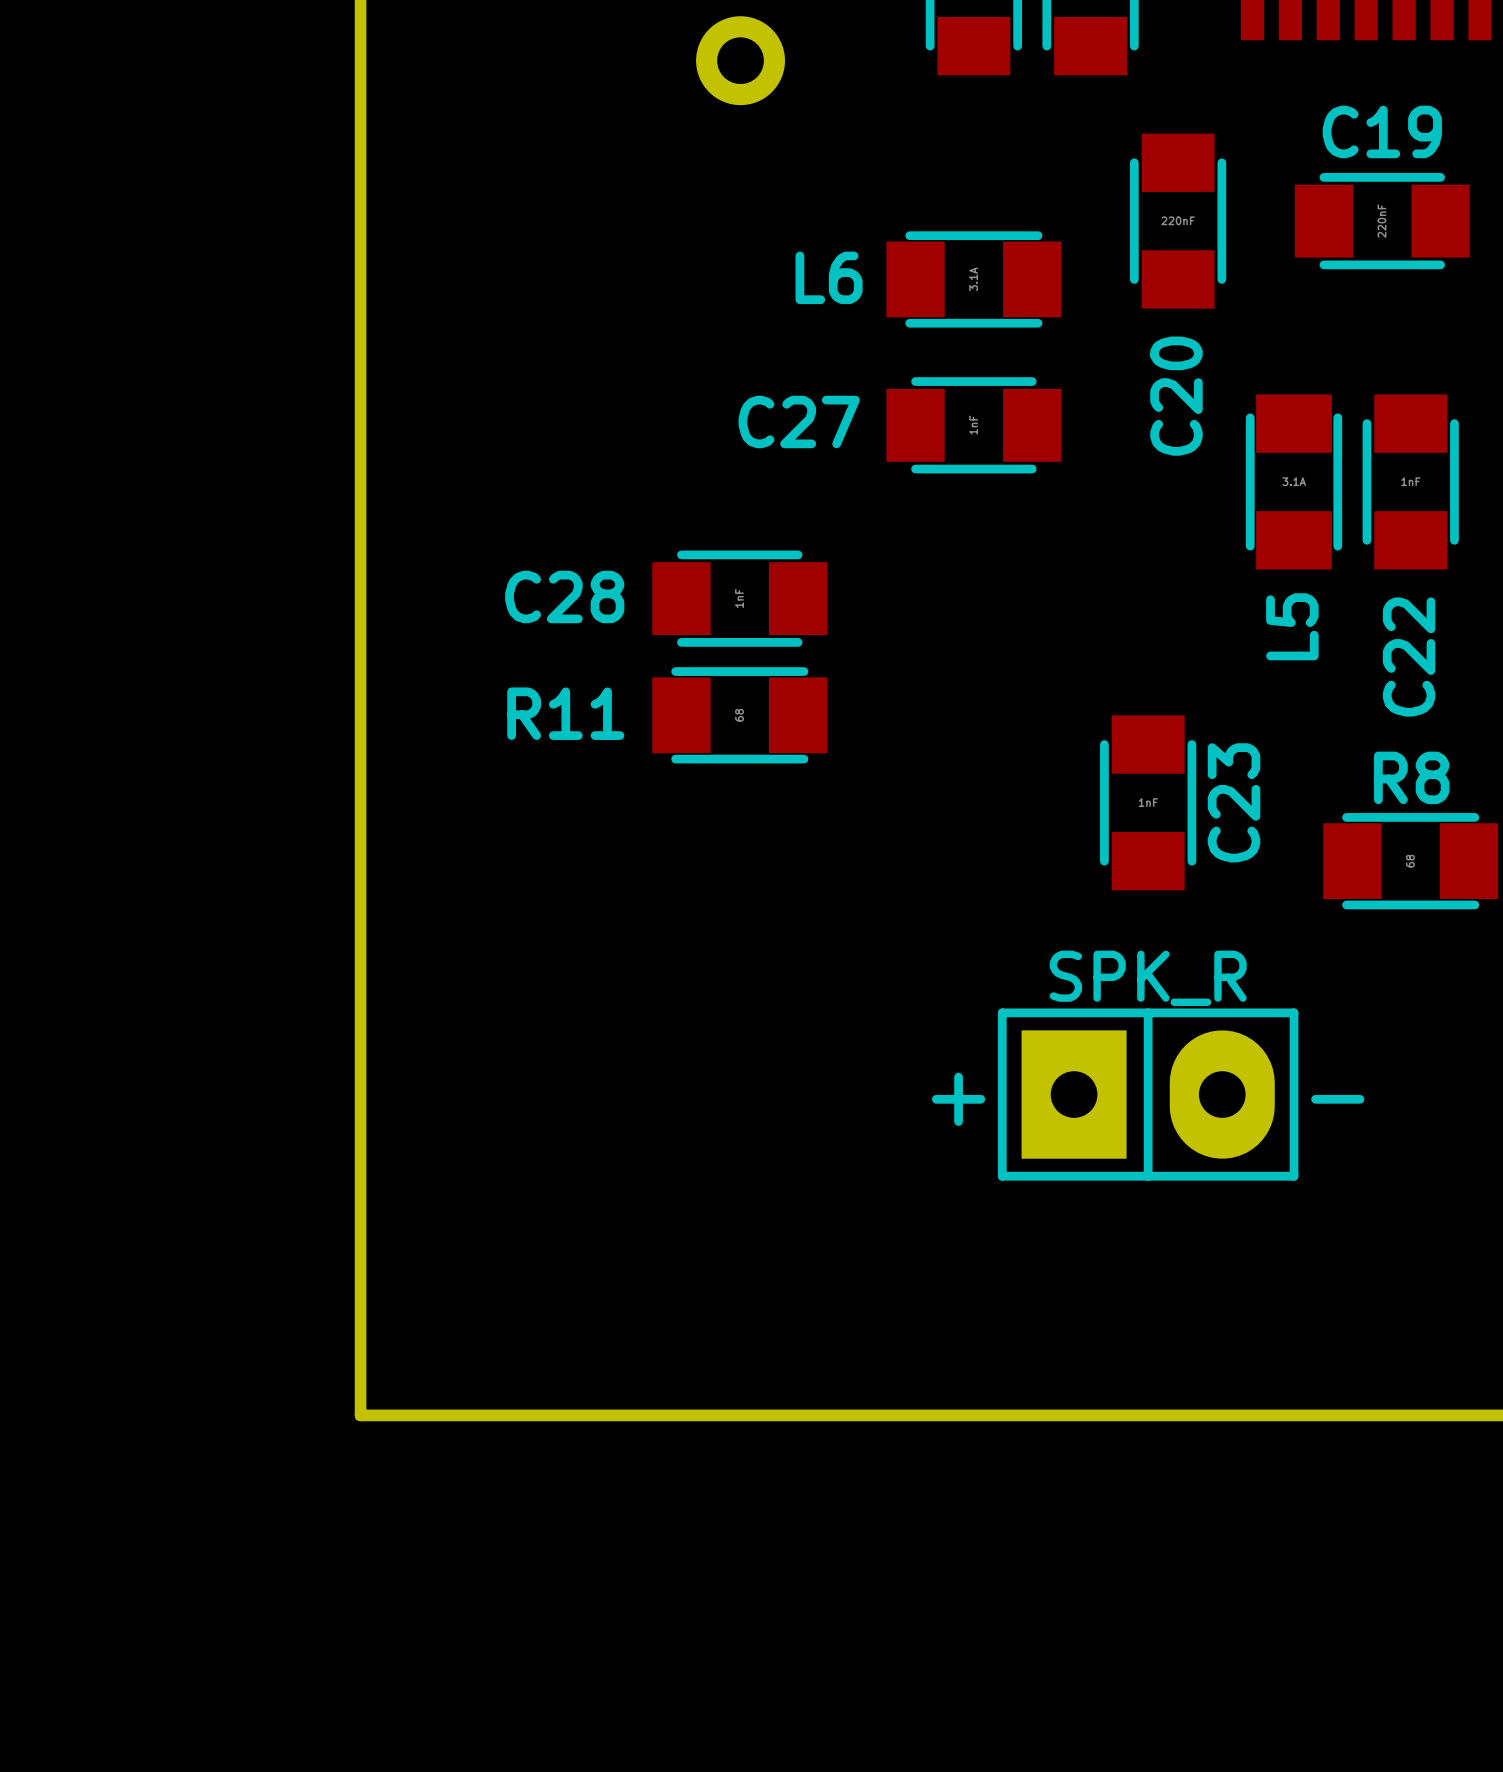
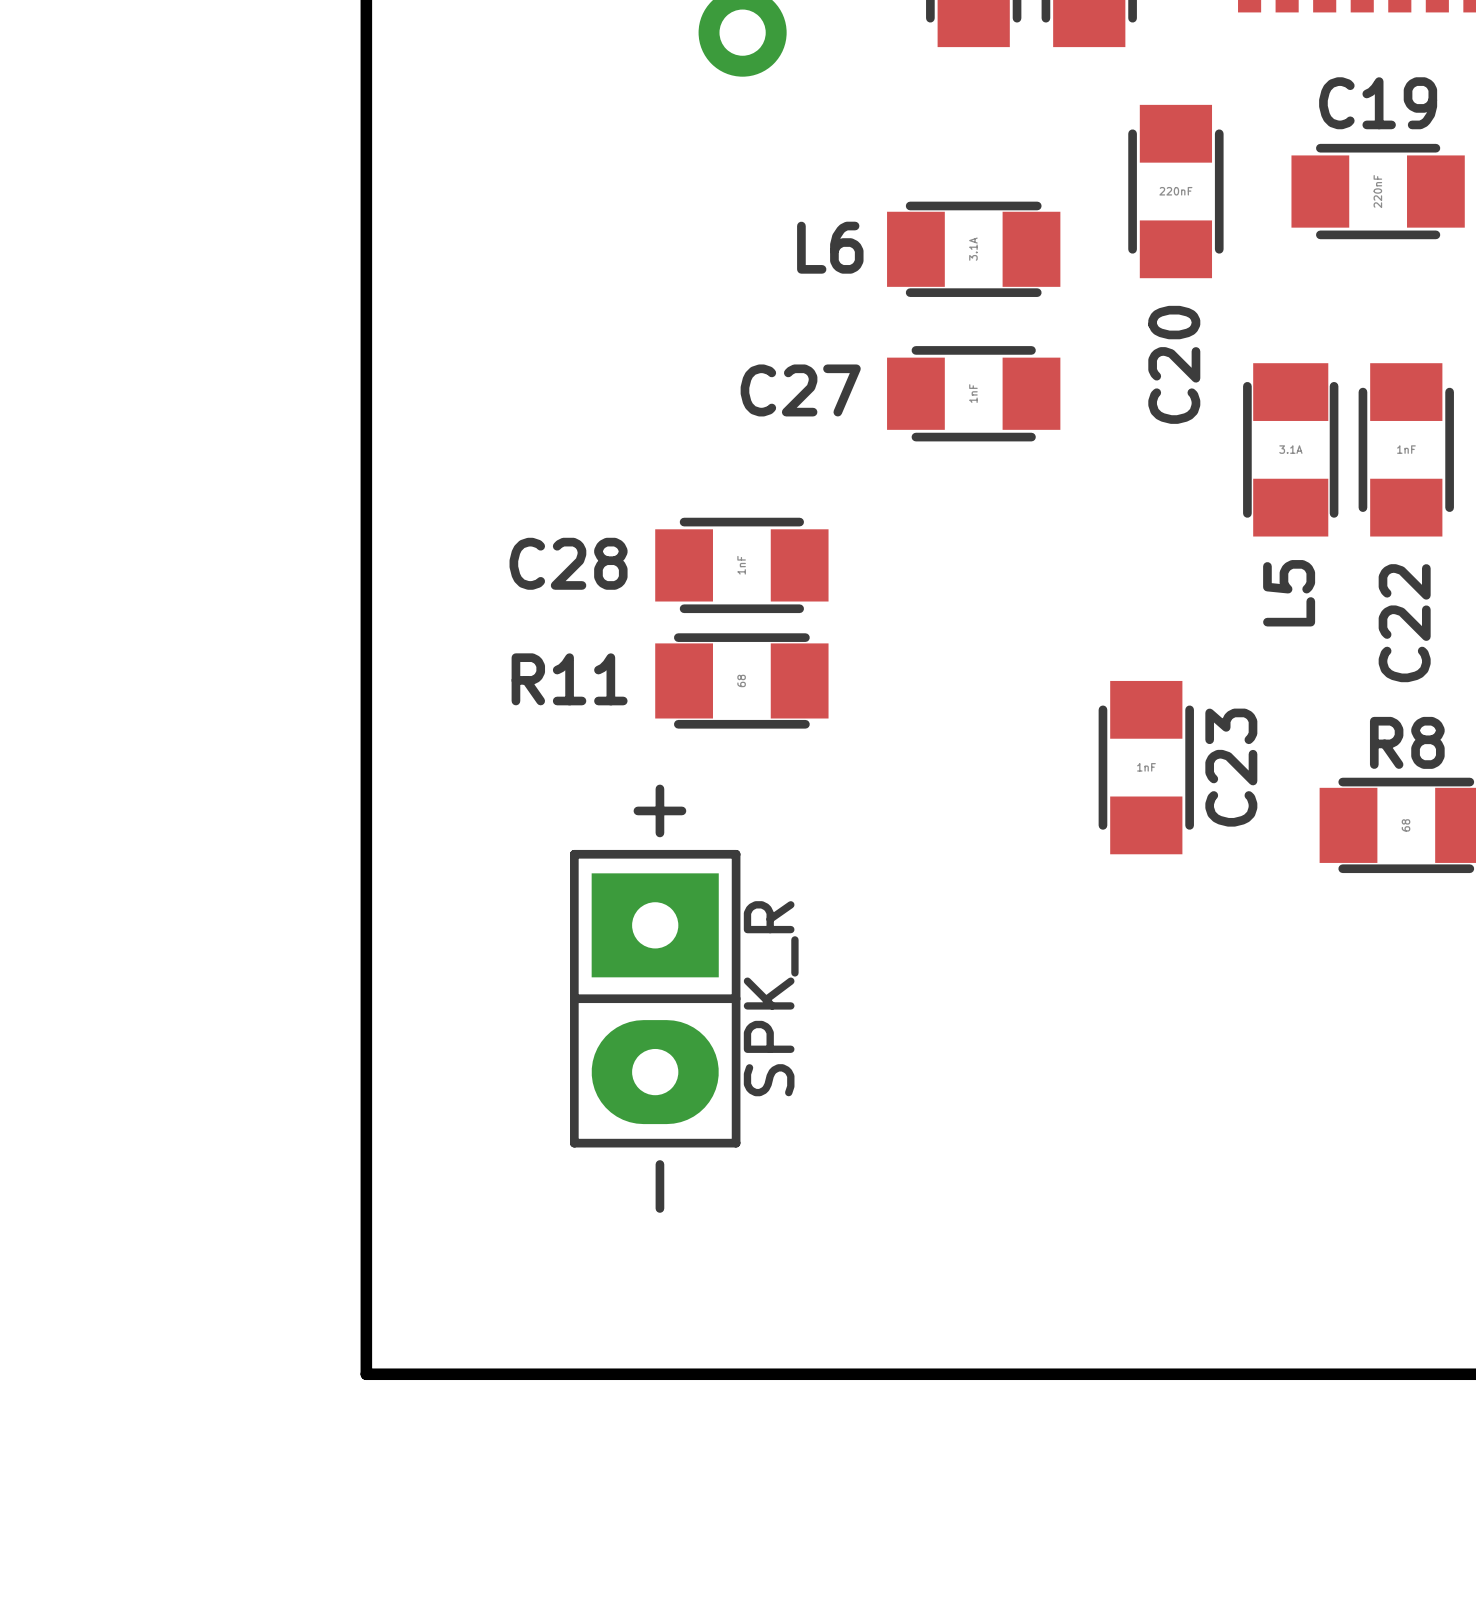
part rotation: 0° (1148, 1094) -> 90° clockwise (655, 998)
part position: (1148, 1094) -> (655, 998)

